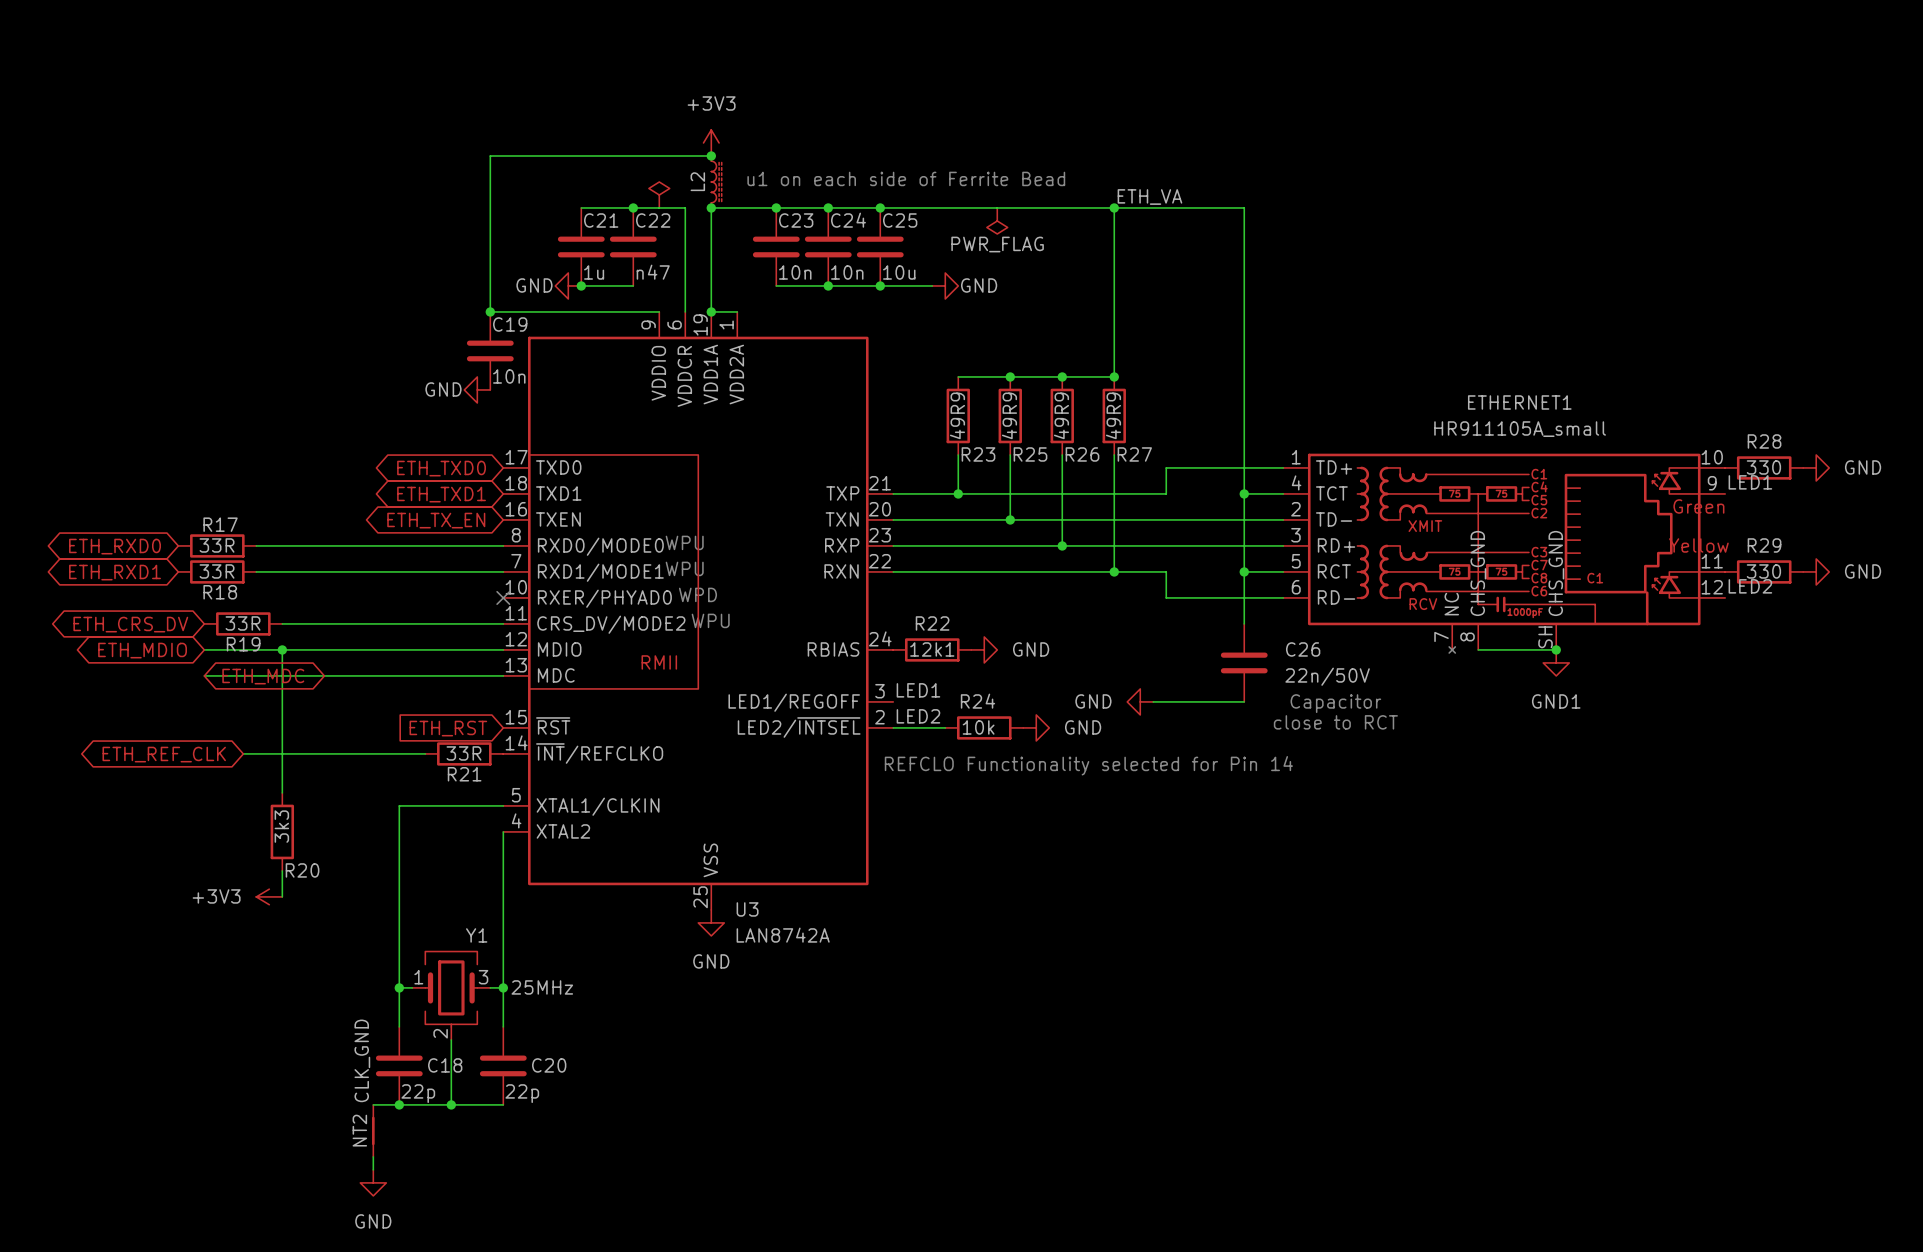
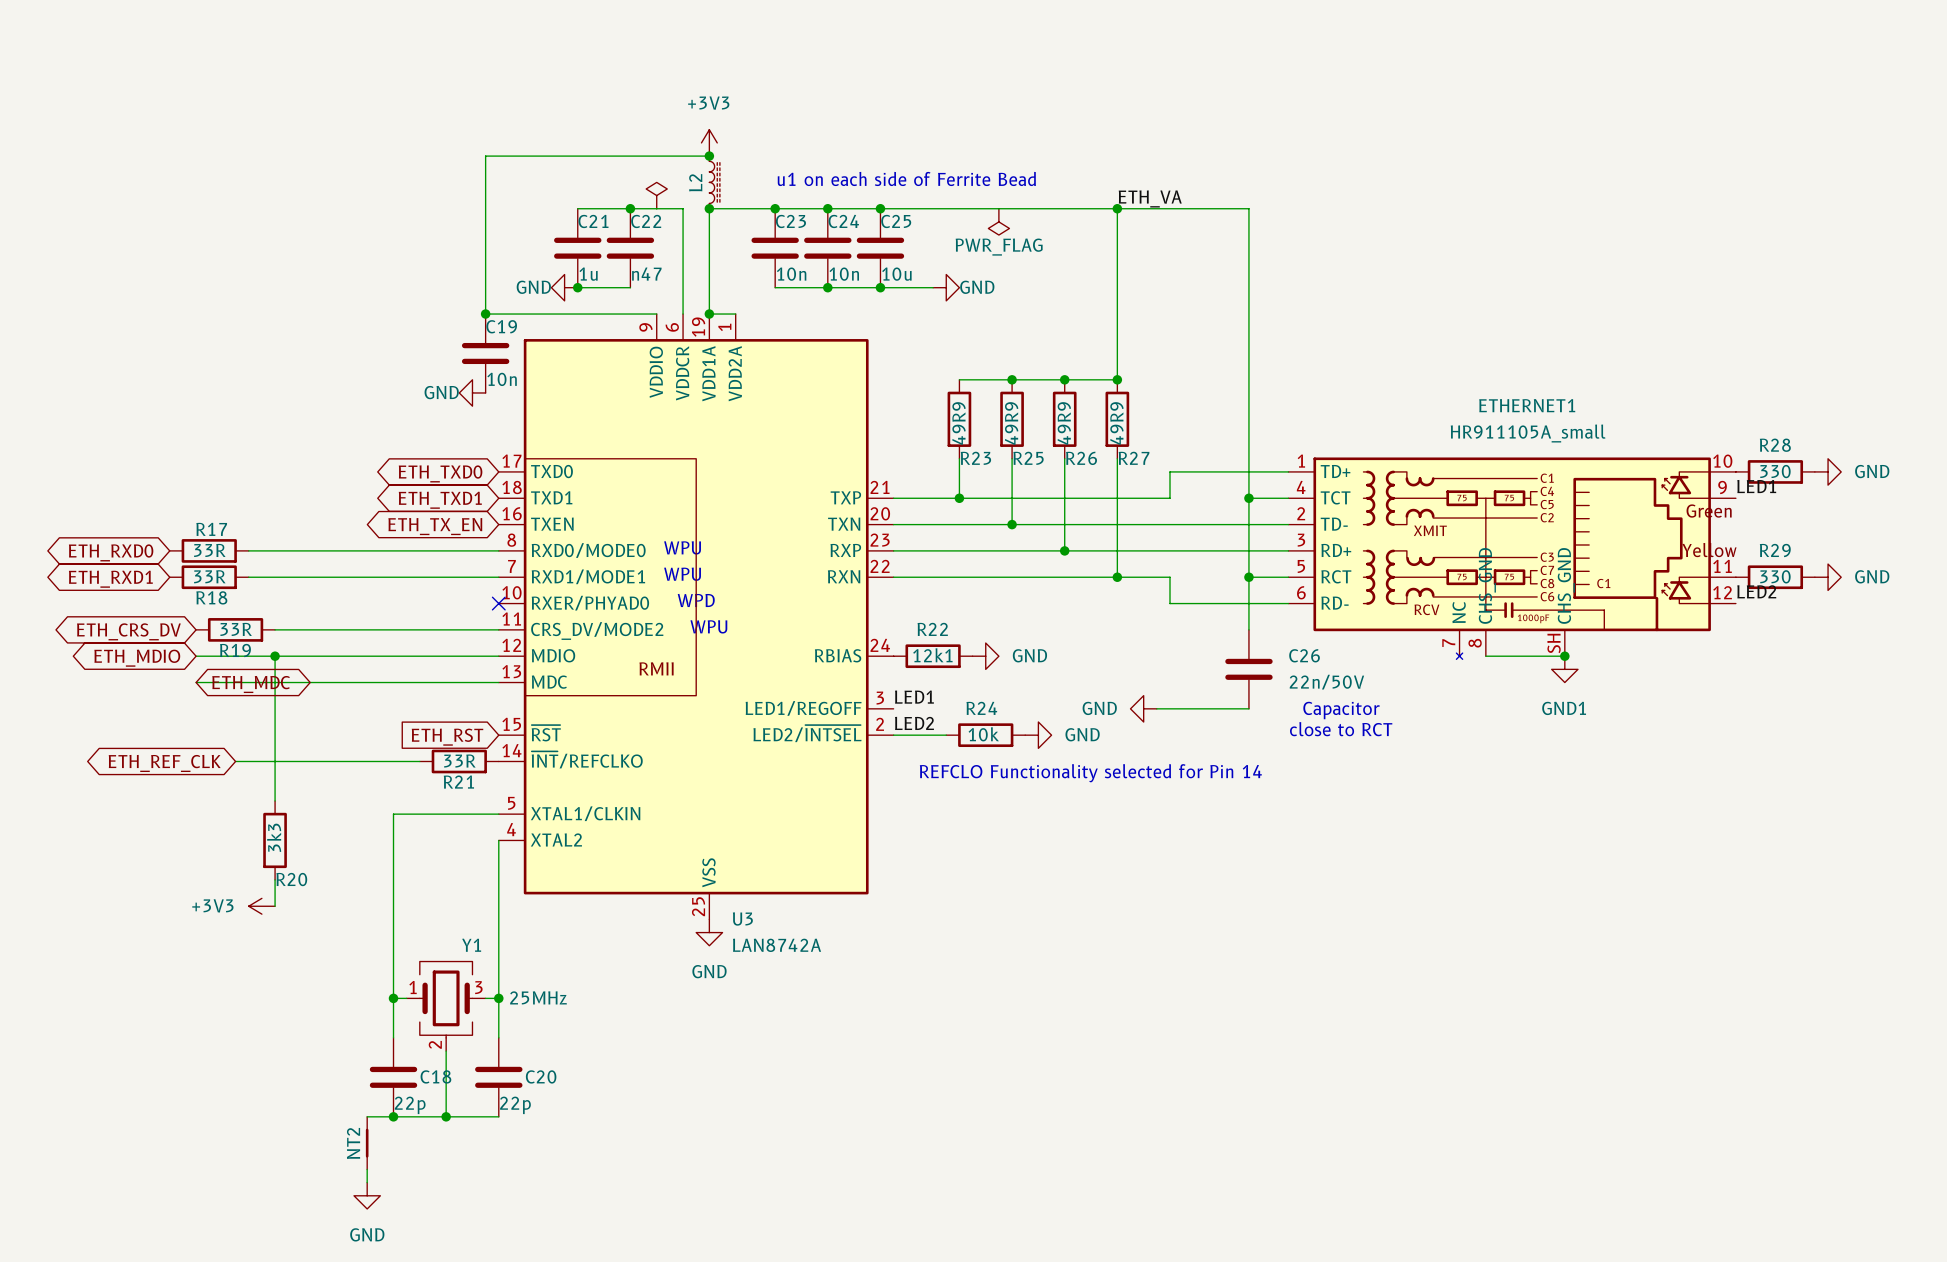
label: CLK_GND (362, 1060) -> none

